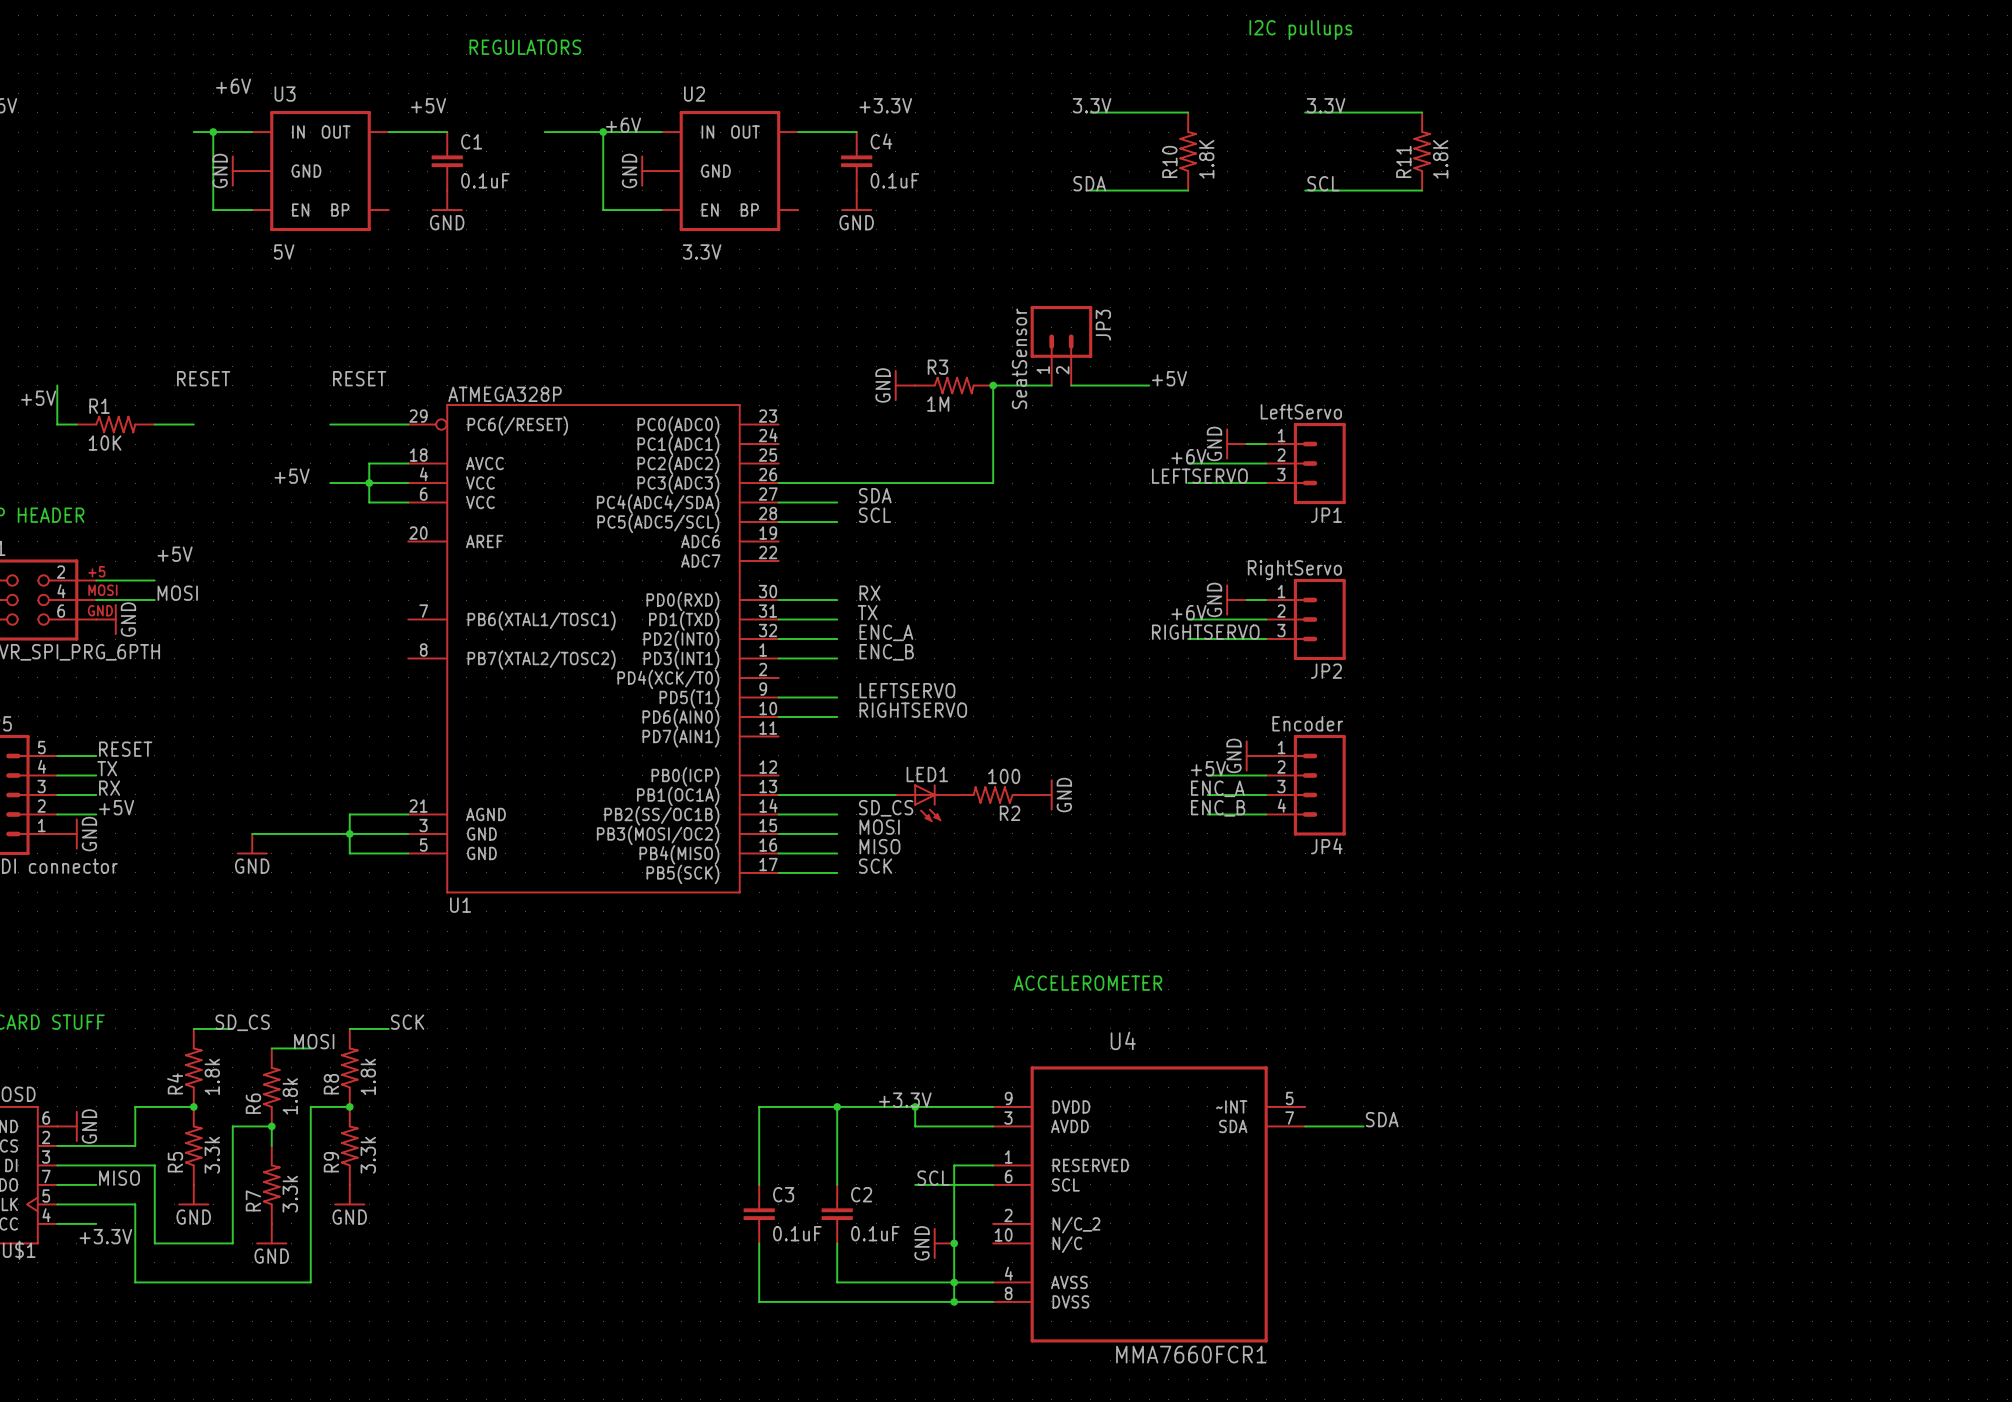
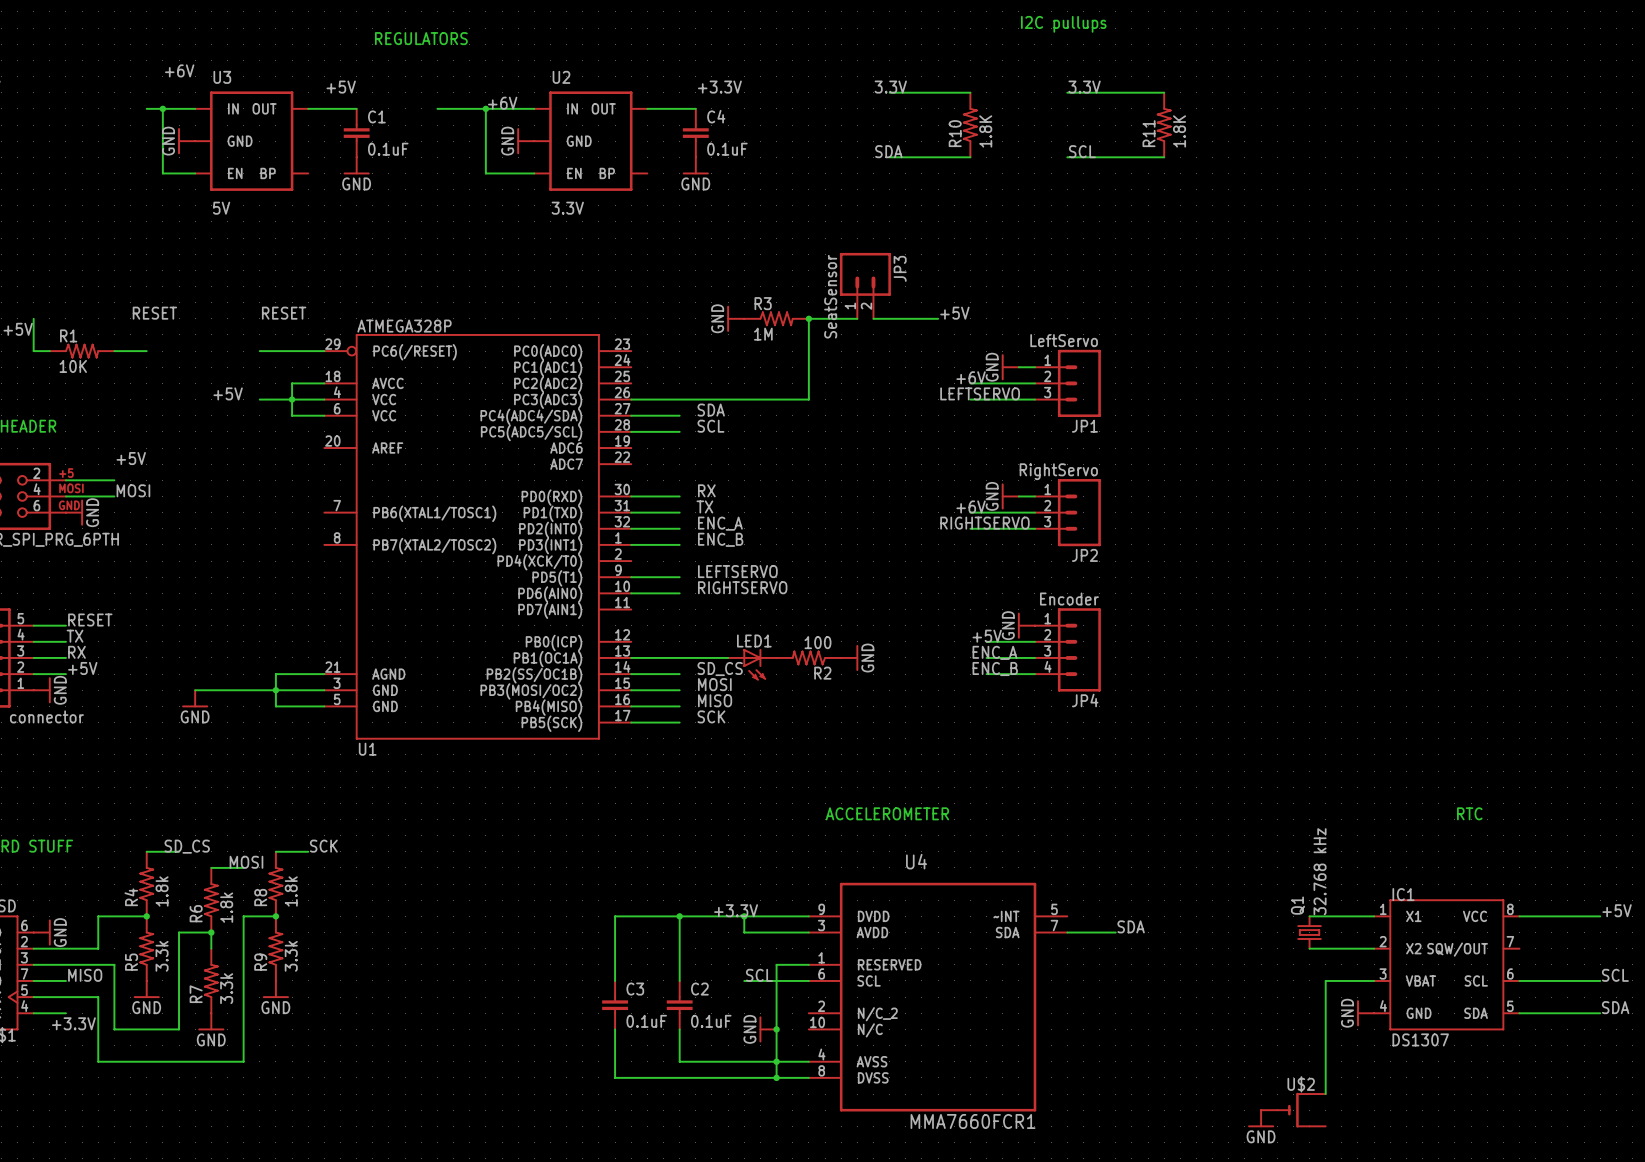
text: none -> RTC (1469, 813)
label: none -> +5V (1617, 910)
wire: none -> (1309, 916) (1374, 916)
wire: none -> (1519, 916) (1600, 916)
Q1: none -> 32.768 kHz (1309, 932)
wire: none -> (1309, 948) (1374, 948)
IC1: none -> DS1307 (1446, 964)
label: none -> SCL (1615, 975)
wire: none -> (1374, 980) (1325, 980) (1325, 1094)
wire: none -> (1519, 980) (1600, 980)
label: none -> SDA (1615, 1007)
power symbol: none -> GND (1365, 1013)
wire: none -> (1519, 1013) (1600, 1013)
U$2: none -> (1293, 1110)
power symbol: none -> GND (1261, 1118)

